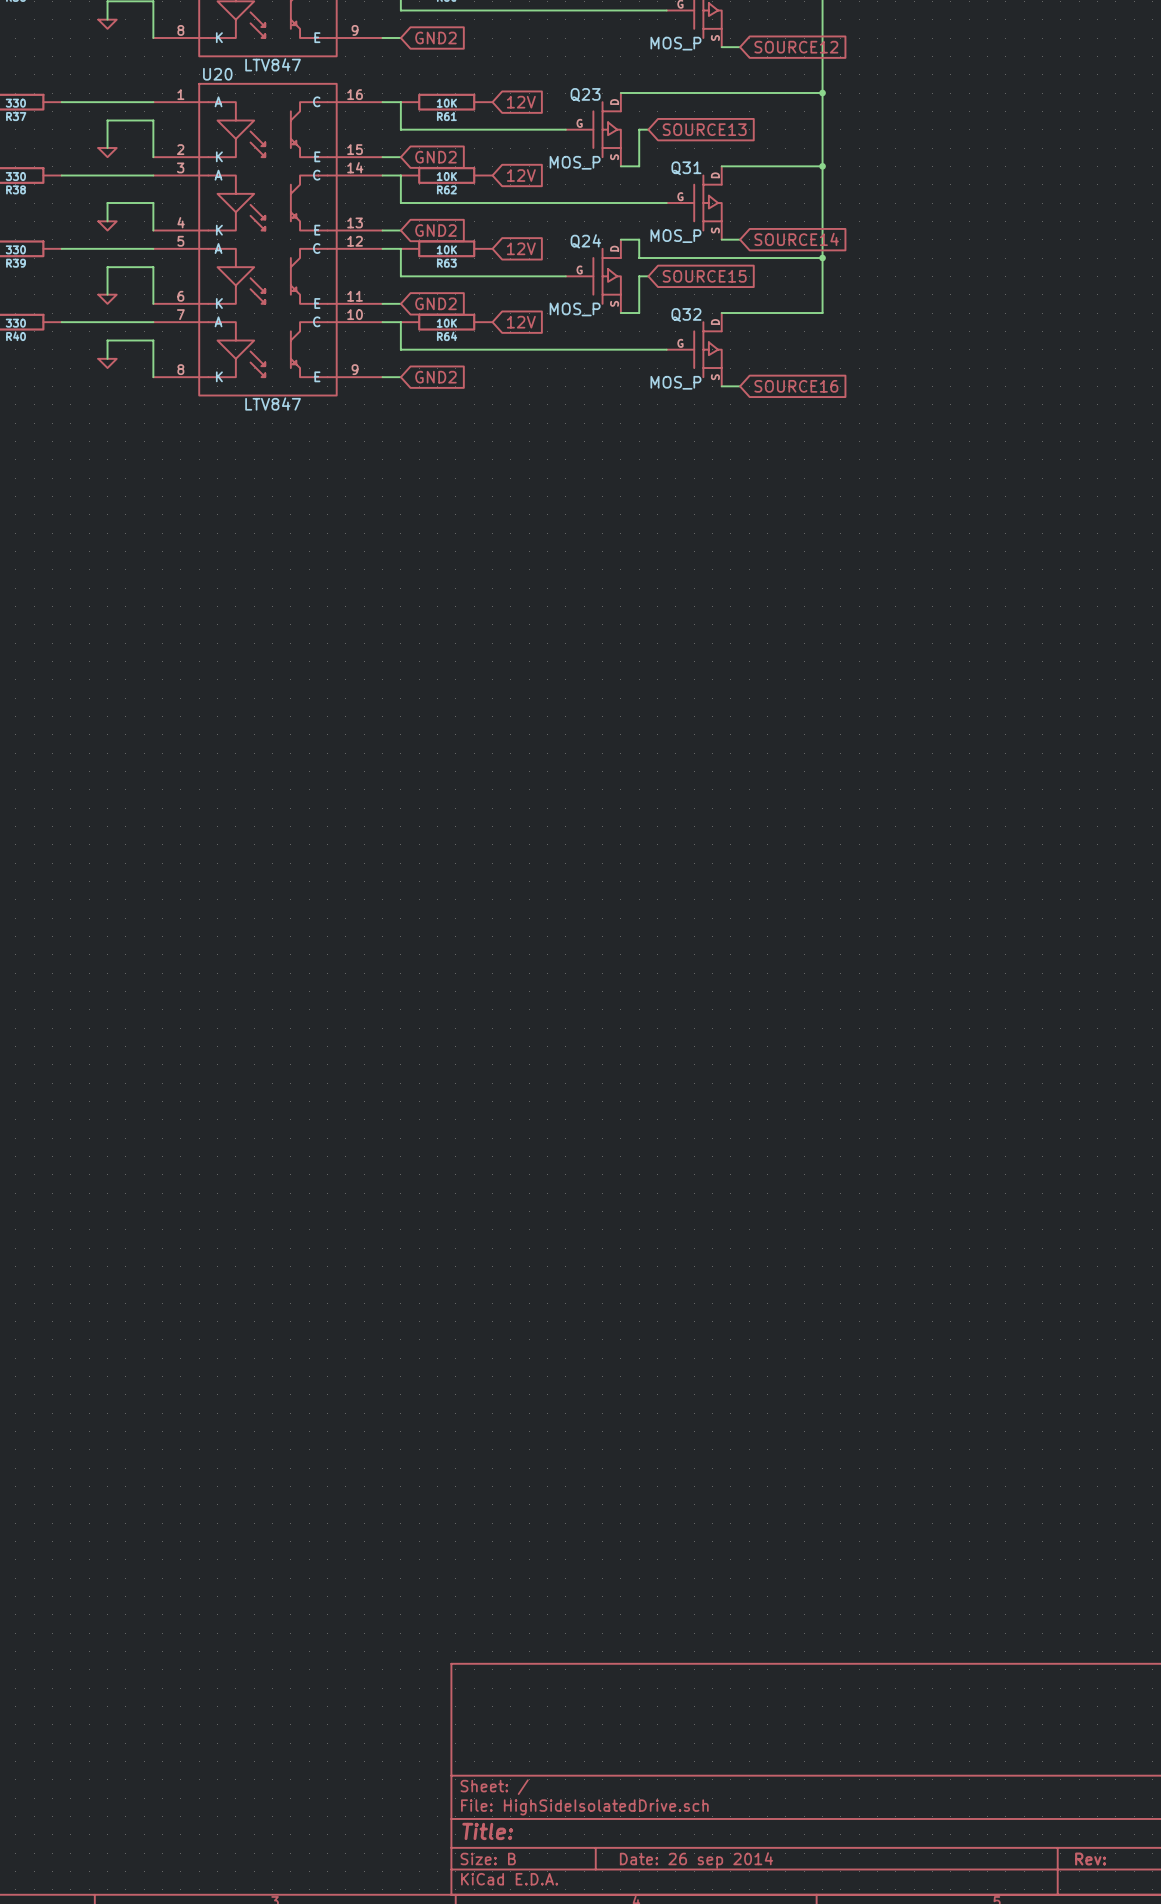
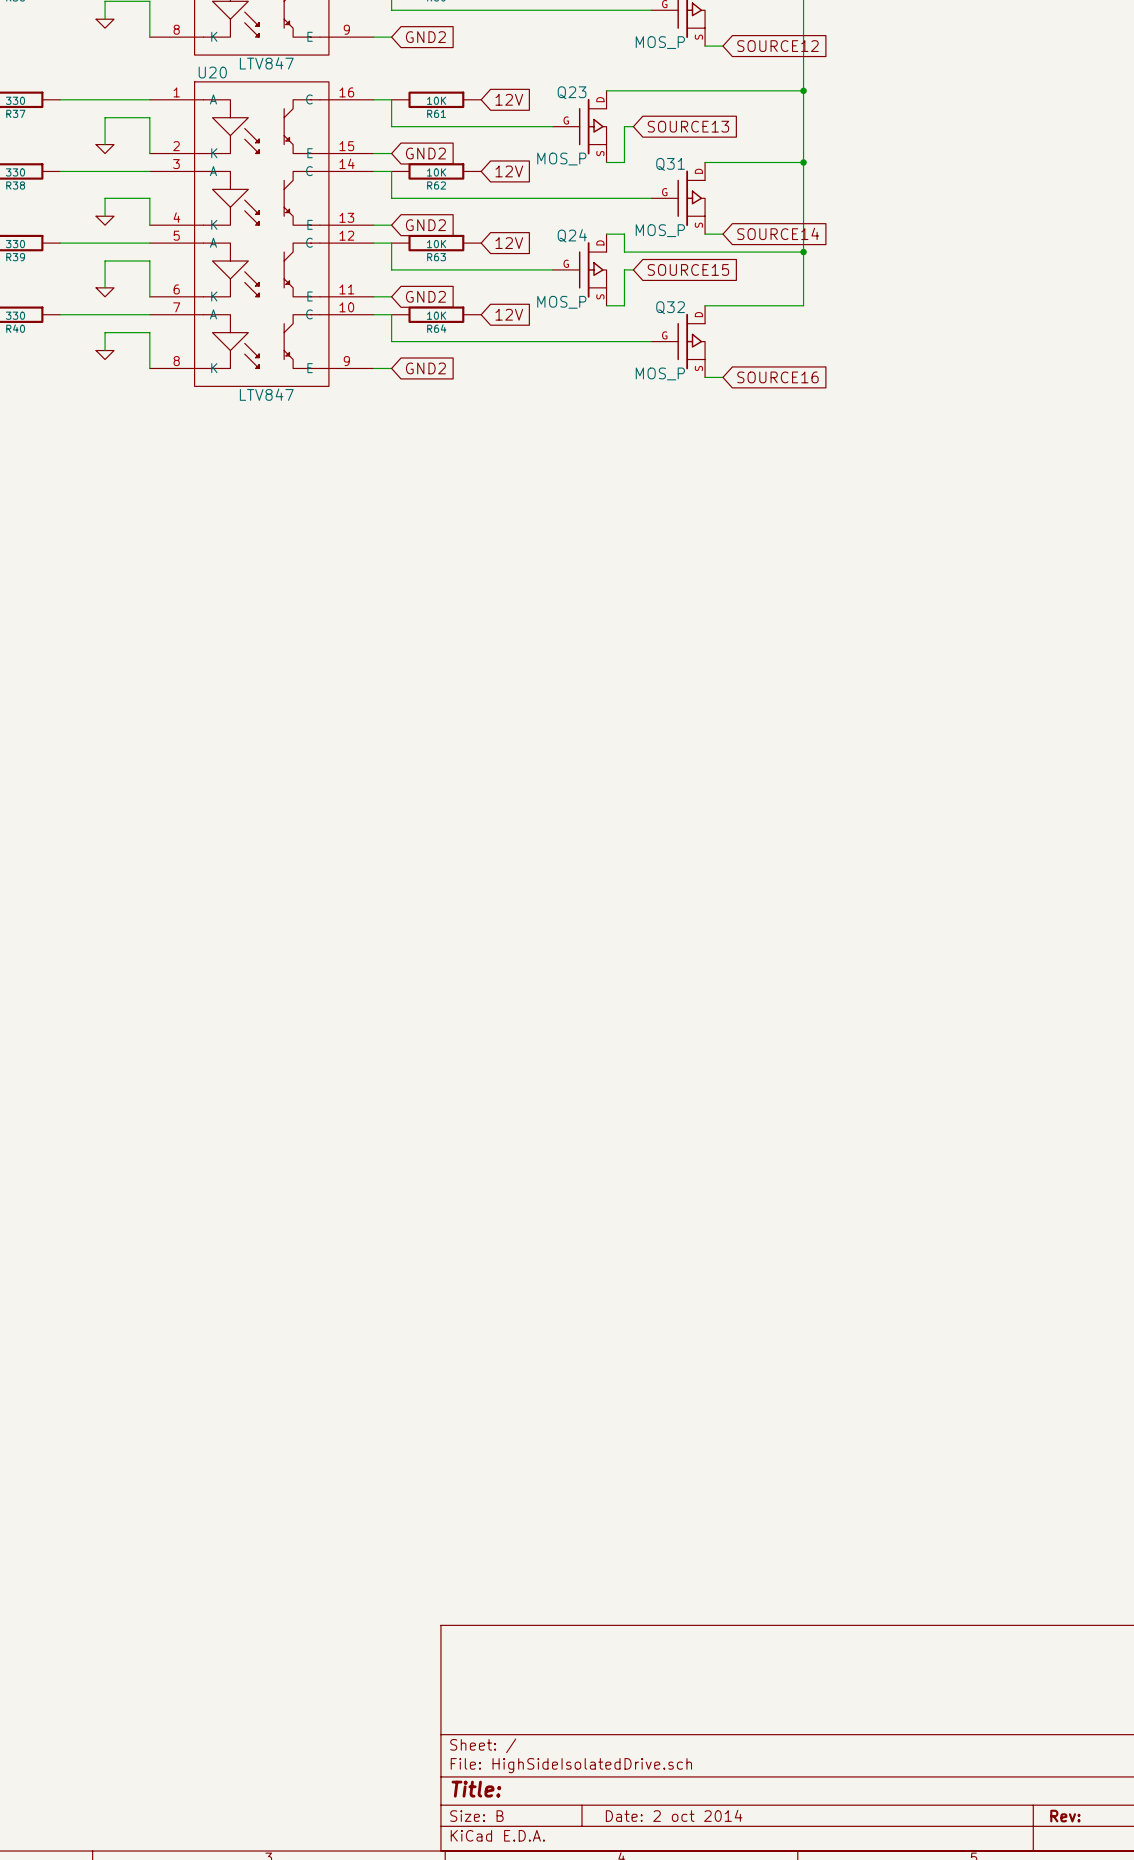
title block: Date: 26 sep 2014 (696, 1860) -> Date: 2 oct 2014 (674, 1815)

